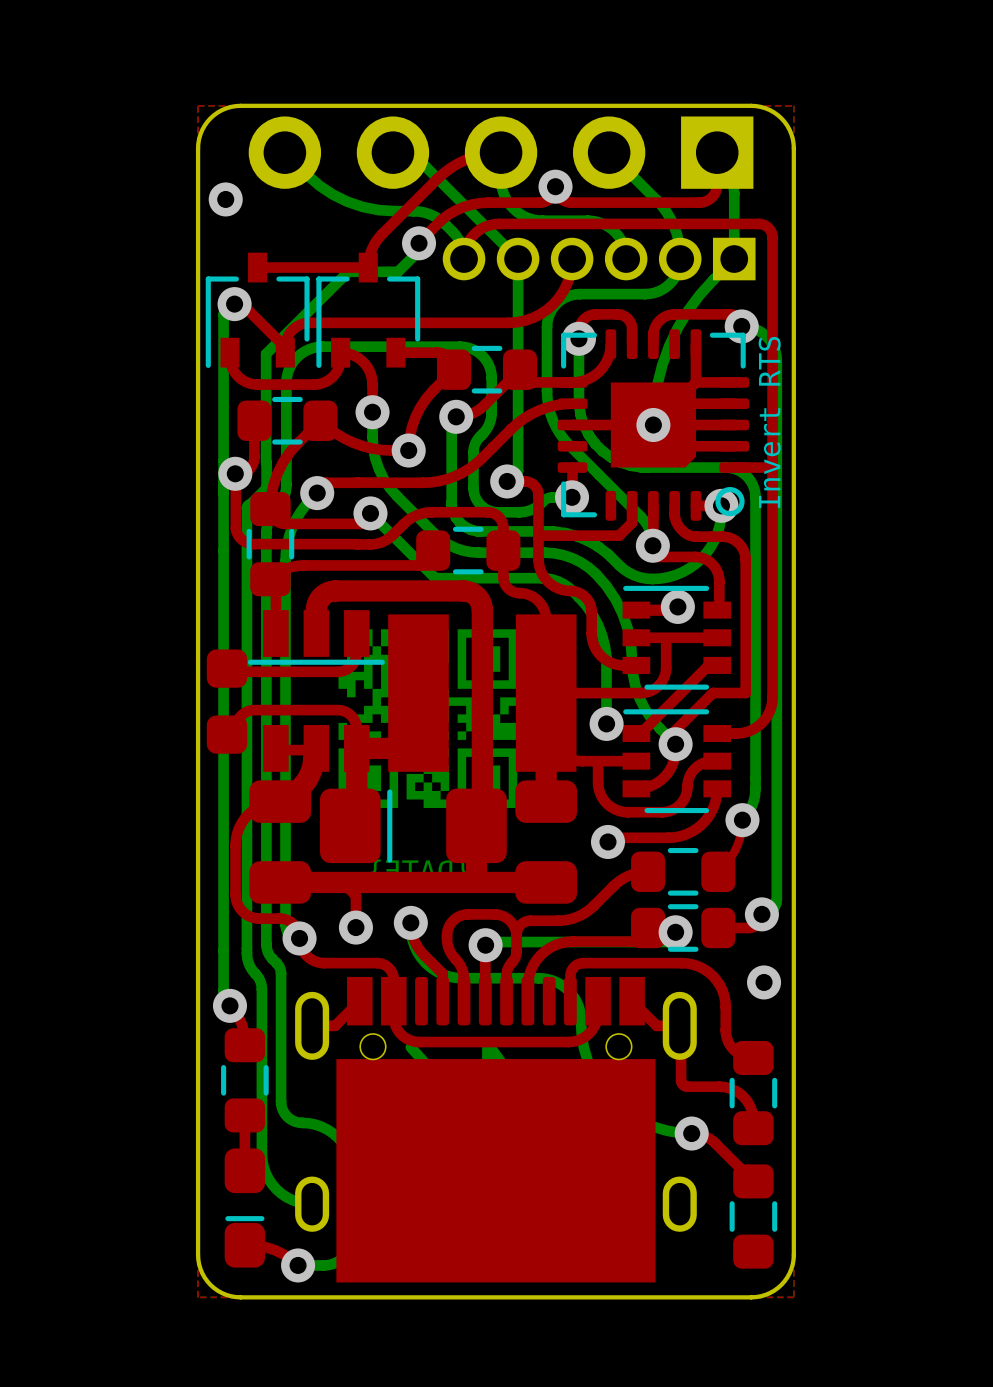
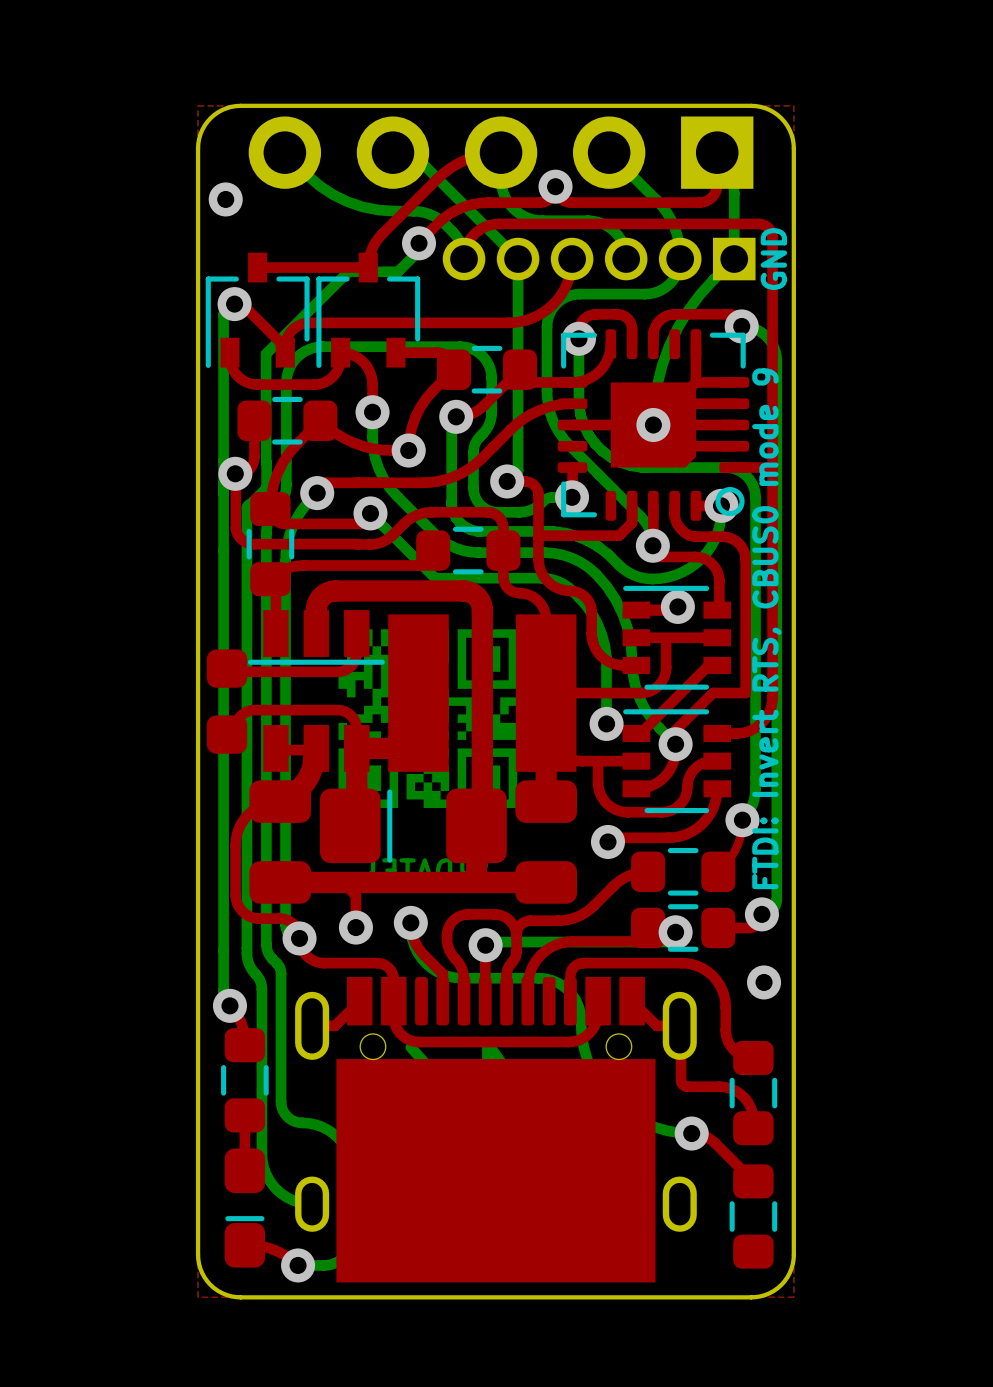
text: none -> GND (773, 259)
text: Invert RTS (769, 422) -> none
text: none -> FTDI: Invert RTS, CBUS0 mode 9 (766, 628)

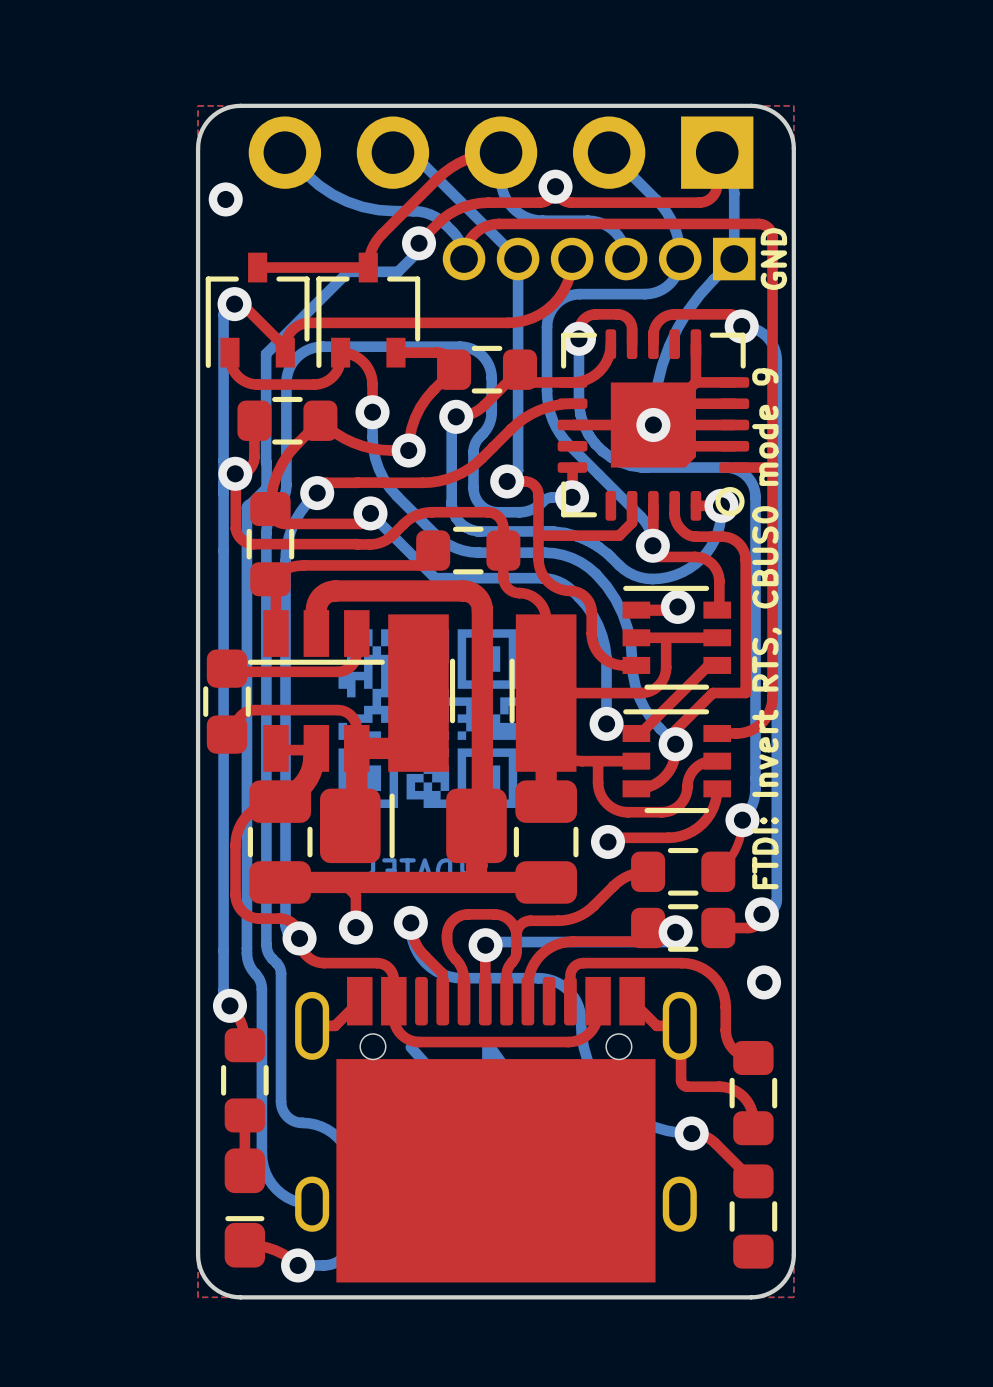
part footprint: [206, 580, 578, 904] -> [206, 580, 578, 904]
drawing: none -> [449, 658, 515, 724]
drawing: none -> [203, 686, 251, 717]
drawing: none -> [389, 793, 395, 859]
drawing: none -> [247, 826, 313, 858]
drawing: none -> [513, 826, 579, 858]

